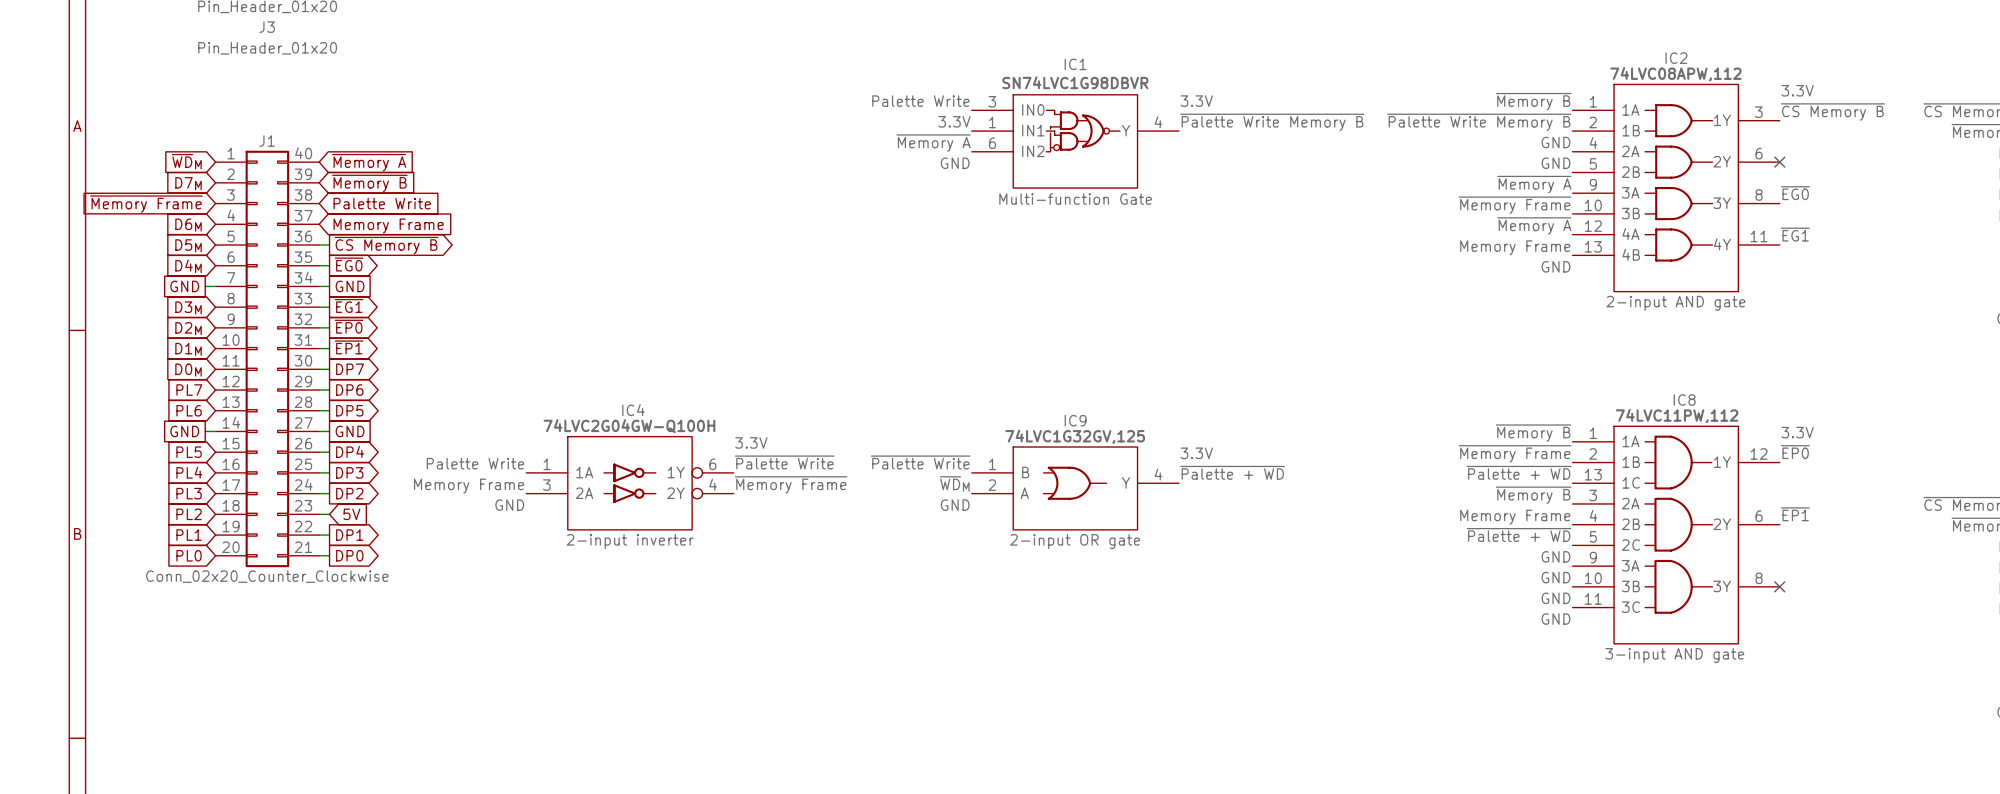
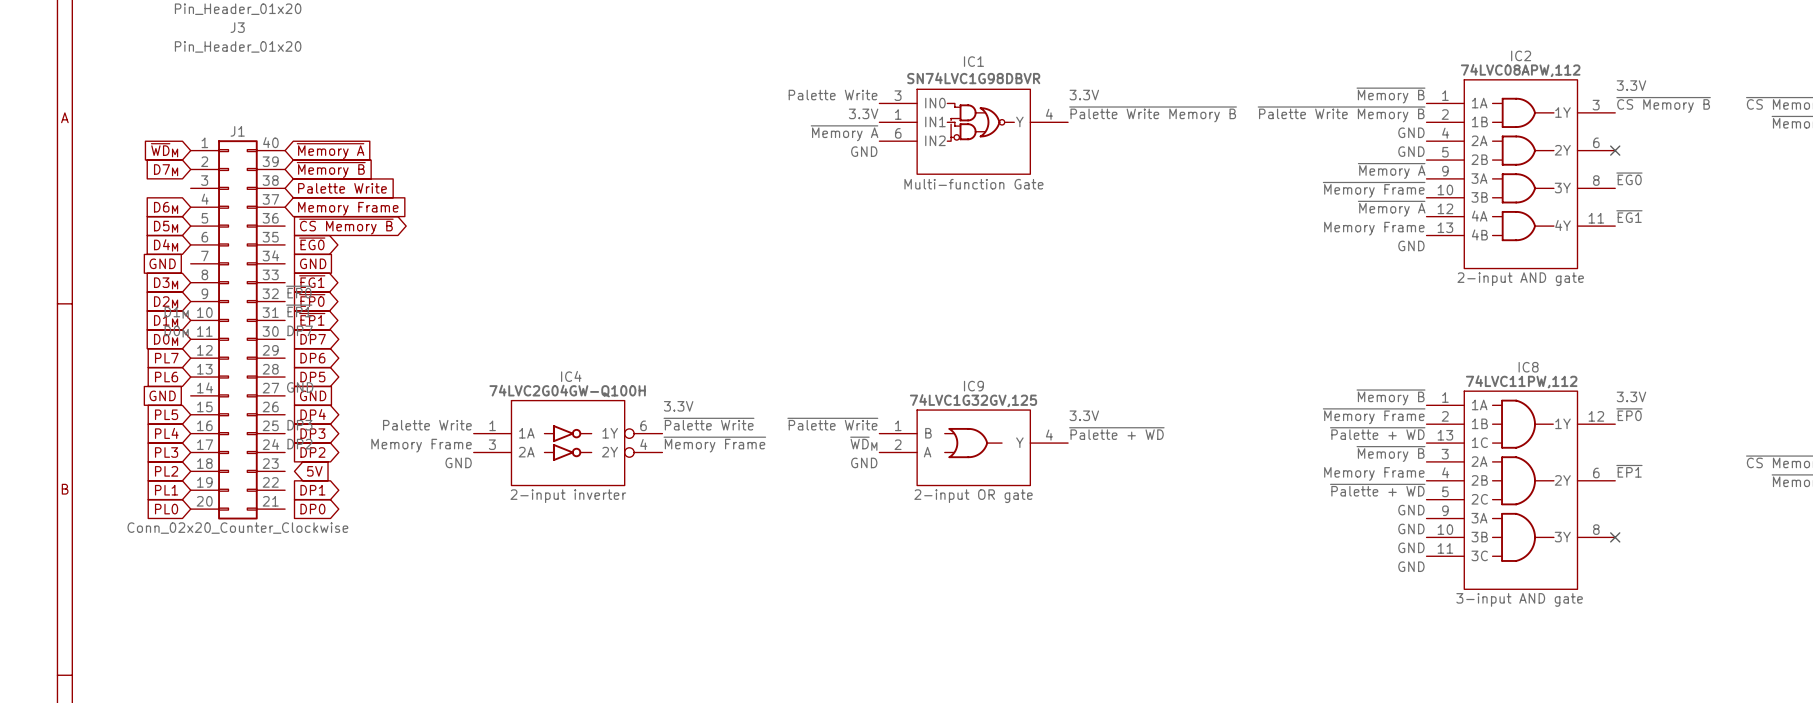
global label: ~{Memory Frame} (146, 204) -> none
wire: (319, 245) (329, 245) -> none
wire: (319, 265) (329, 265) -> none
wire: (205, 286) (215, 286) -> none
wire: (319, 286) (329, 286) -> none
wire: (319, 307) (329, 307) -> none
label: none -> ~{EP0} (299, 292)
wire: (319, 327) (329, 327) -> none
label: none -> ~{EP1} (299, 310)
label: none -> D1M (176, 312)
wire: (319, 348) (329, 348) -> none
label: none -> D0M (176, 331)
label: none -> DP7 (300, 330)
wire: (319, 369) (329, 369) -> none
wire: (319, 390) (329, 390) -> none
wire: (319, 410) (329, 410) -> none
label: none -> GND (300, 387)
wire: (205, 431) (215, 431) -> none
wire: (319, 431) (329, 431) -> none
wire: (319, 452) (329, 452) -> none
label: none -> DP3 (299, 425)
wire: (319, 472) (329, 472) -> none
label: none -> DP2 (299, 444)
wire: (319, 493) (329, 493) -> none
wire: (319, 514) (329, 514) -> none
wire: (319, 535) (329, 535) -> none
wire: (319, 555) (329, 555) -> none

